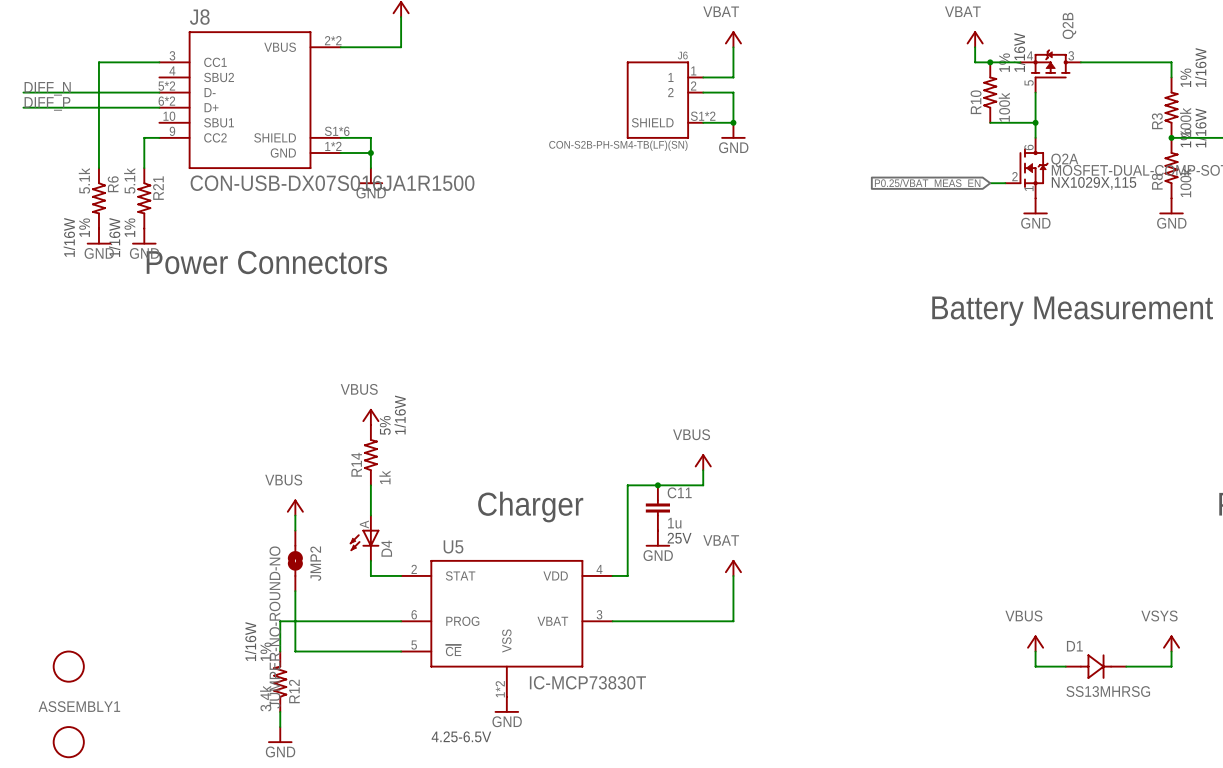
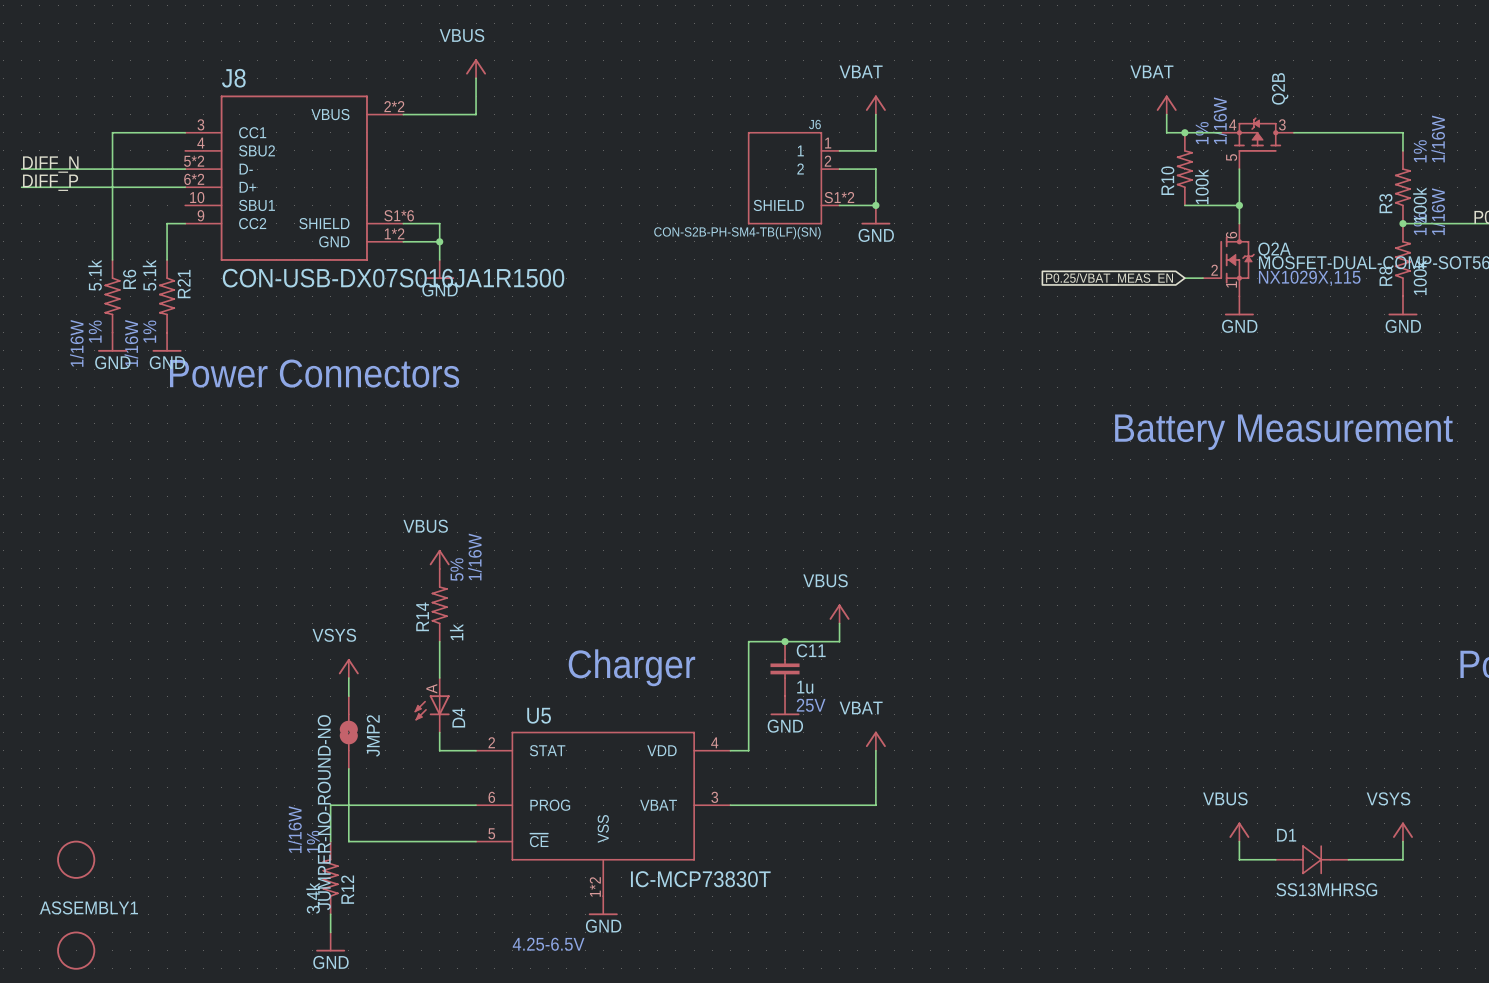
power symbol: VBUS (295, 507) -> VSYS (348, 668)

